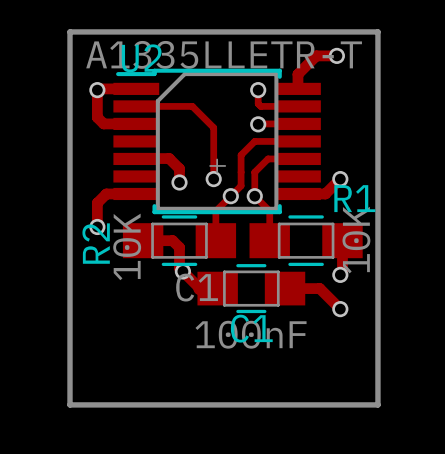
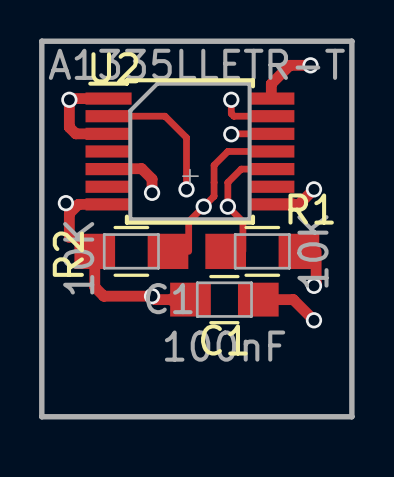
via position: (97, 226) -> (65, 203)
track: none -> (94, 251) (94, 287) (103, 296) (152, 296) (155, 299) (190, 299)
track: (143, 240) (172, 240) (179, 247) (179, 268) (200, 288) -> none
R2 position: (179, 240) -> (131, 251)
R1 position: (306, 240) -> (262, 251)
via position: (182, 271) -> (152, 296)

